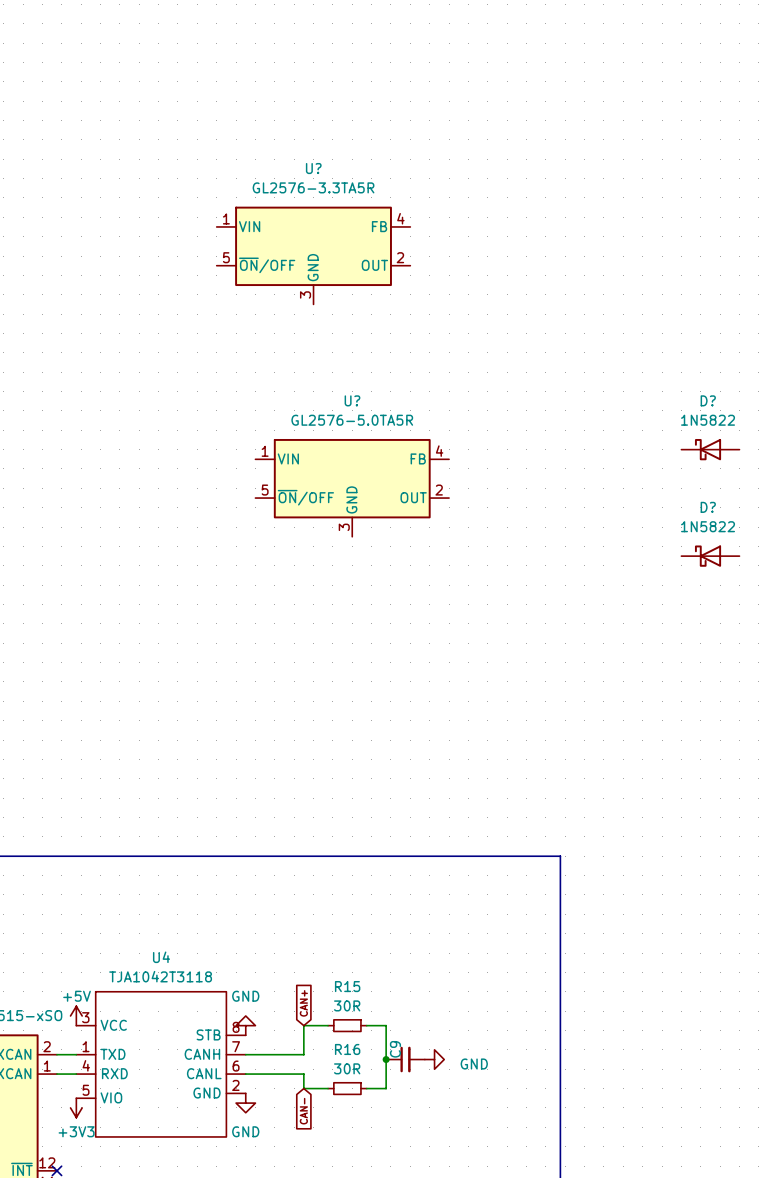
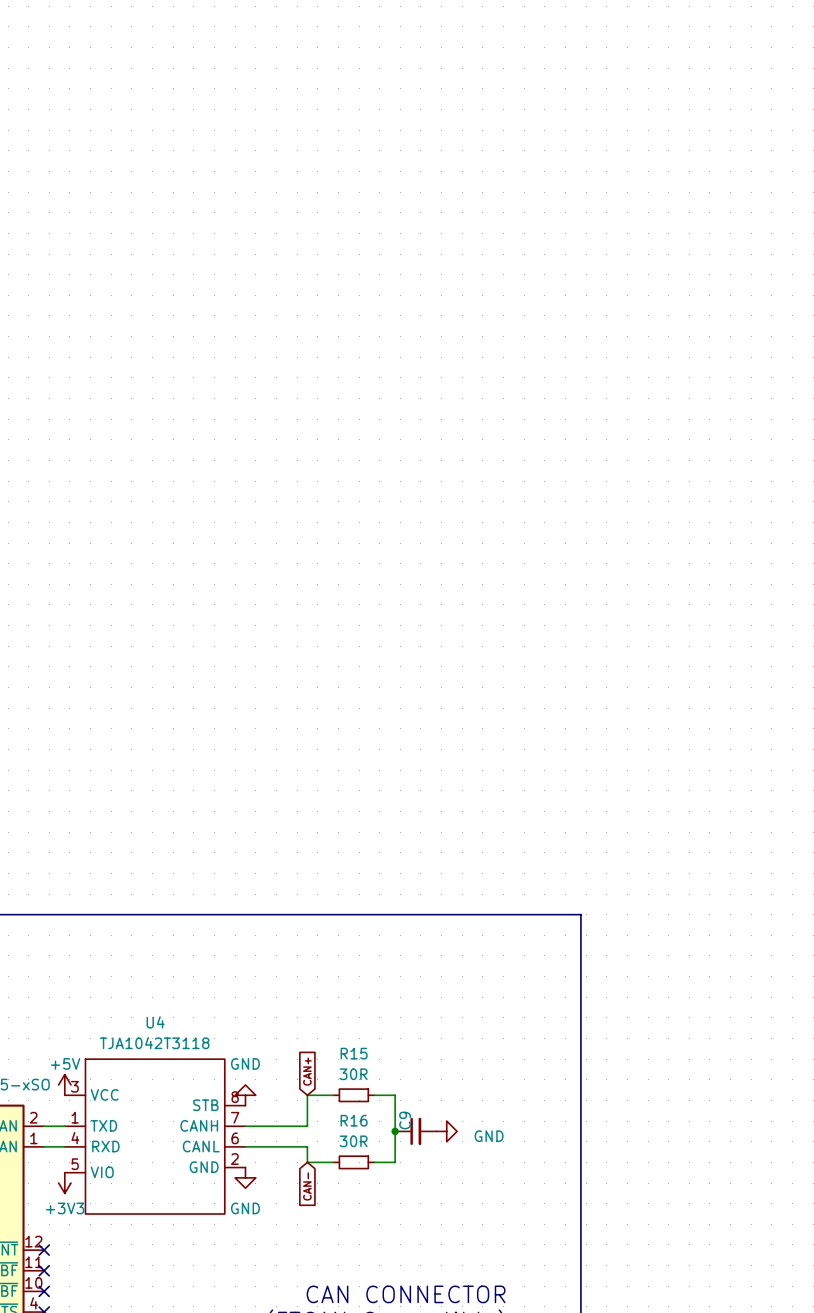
U?: GL2576-3.3TA5R (313, 255) -> none
D?: 1N5822 (710, 449) -> none
U?: GL2576-5.0TA5R (352, 487) -> none
D?: 1N5822 (710, 556) -> none

